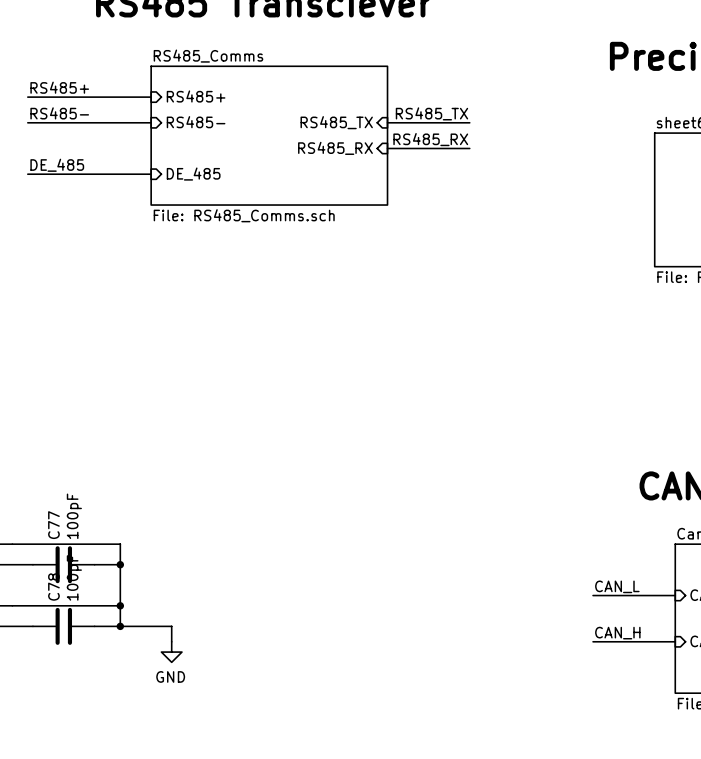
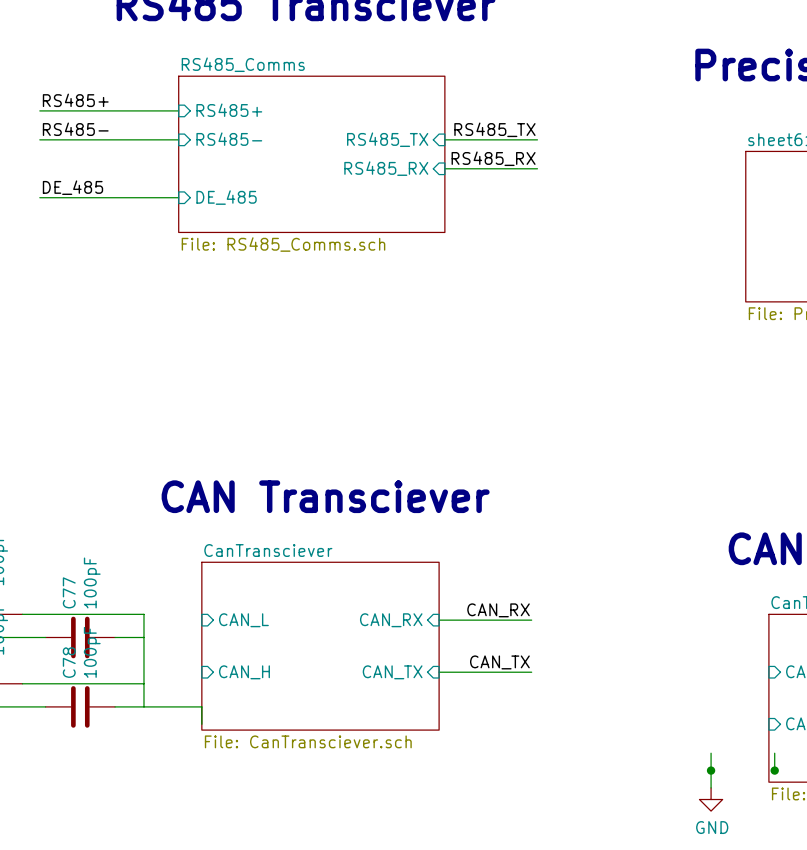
text: none -> CAN Transciever (325, 496)
label: none -> CAN_RX (498, 610)
sheet pin: none -> CAN_L (243, 620)
sheet pin: none -> CAN_RX (391, 620)
wire: none -> (439, 620) (531, 620)
junction: (120, 564) -> none
sheet CanTransciever: none -> File: CanTransciever.sch (320, 646)
label: none -> CAN_TX (499, 662)
label: CAN_L (617, 586) -> none
sheet pin: none -> CAN_H (244, 672)
sheet pin: none -> CAN_TX (392, 672)
wire: none -> (439, 672) (531, 672)
wire: (593, 595) (675, 595) -> none
junction: (120, 605) -> none
junction: (120, 626) -> none
label: CAN_H (617, 633) -> none
wire: (593, 641) (675, 641) -> none
power symbol: GND (171, 652) -> none
wire: none -> (711, 753) (711, 787)
wire: none -> (774, 753) (774, 770)
junction: none -> (711, 770)
junction: none -> (774, 770)
power symbol: none -> GND (711, 799)

